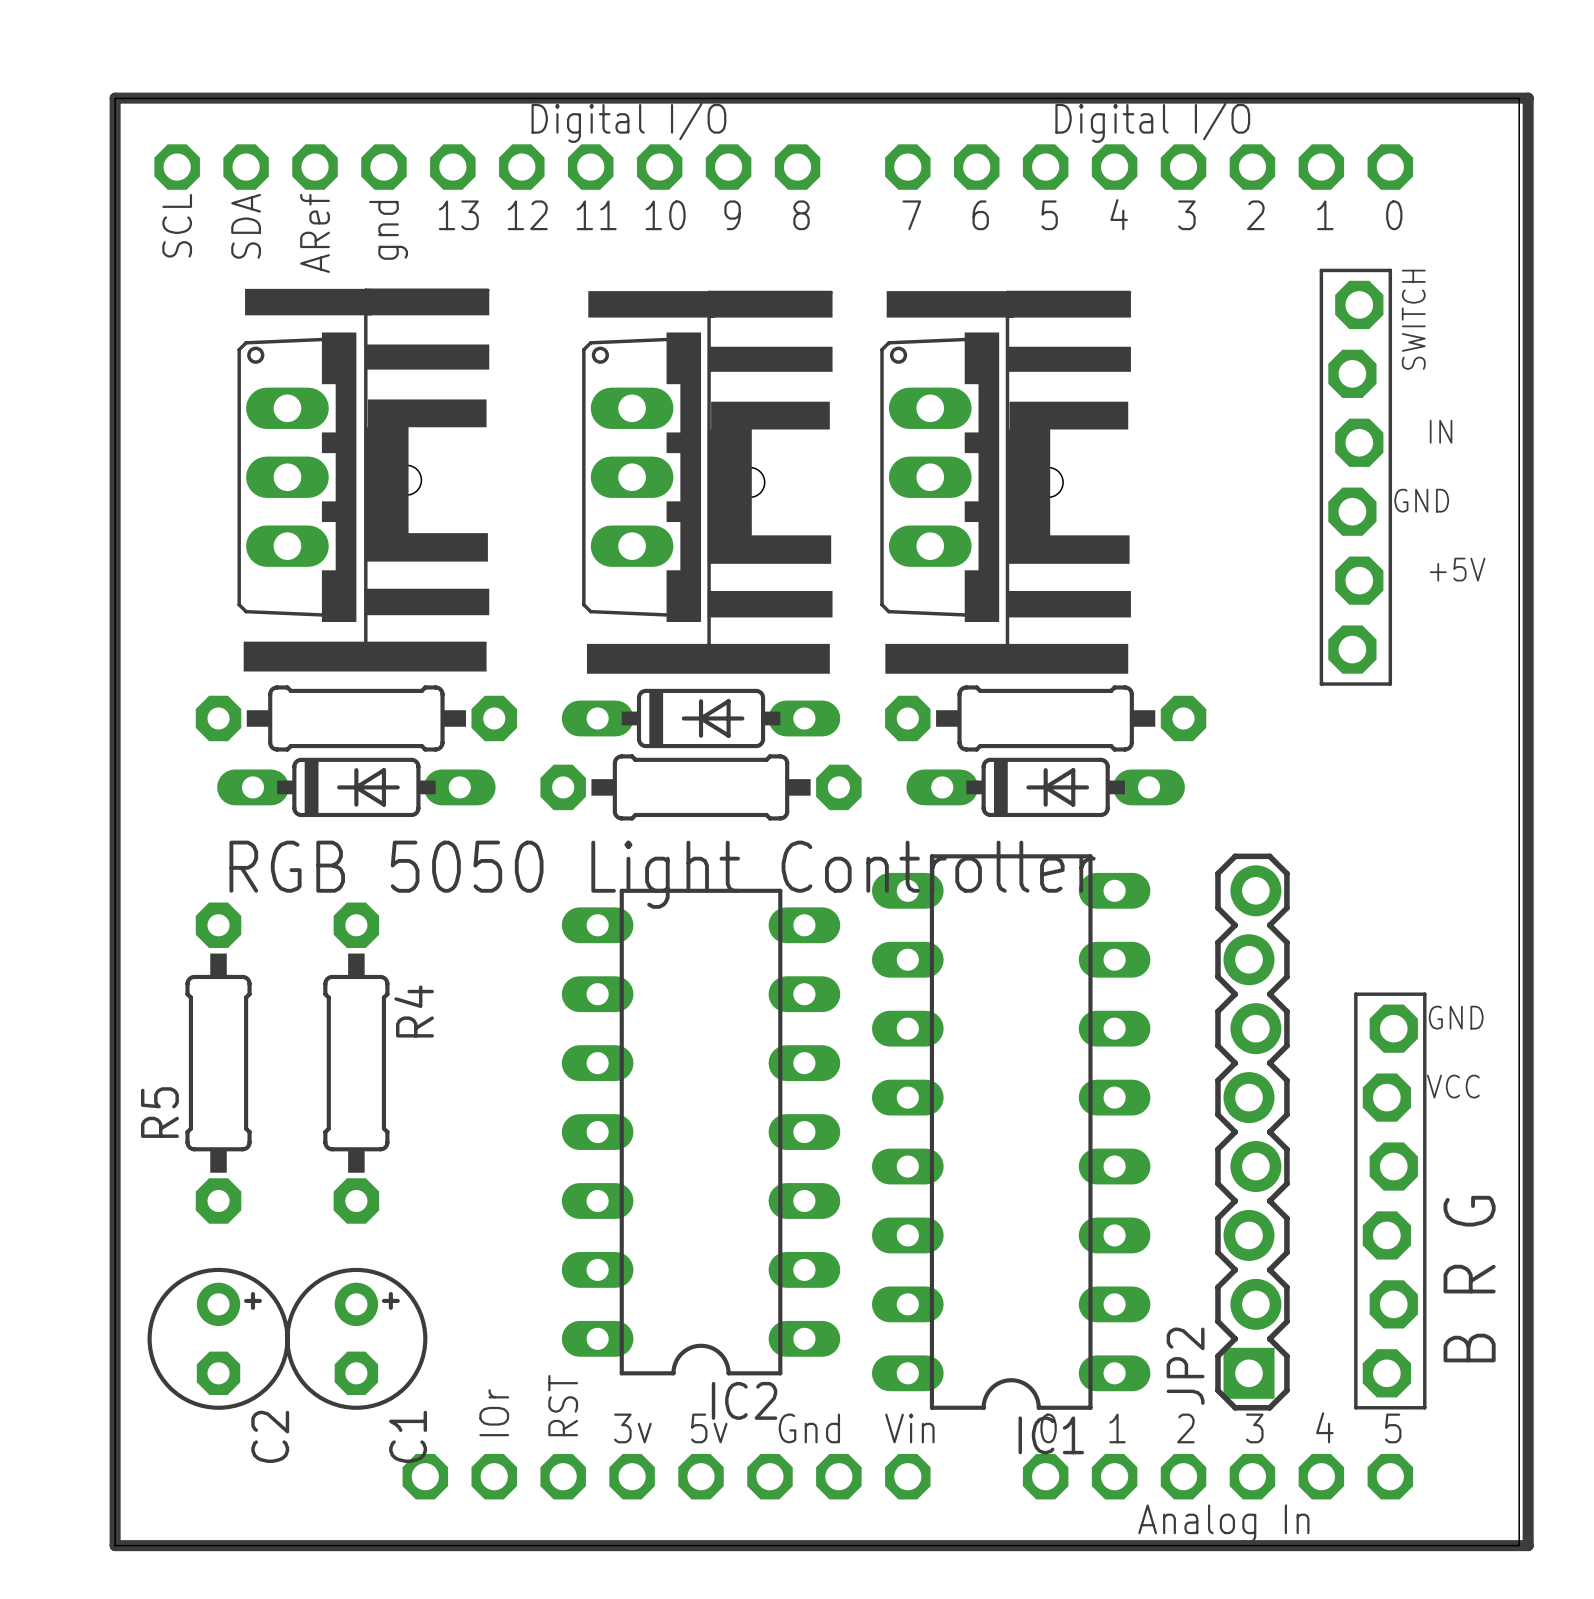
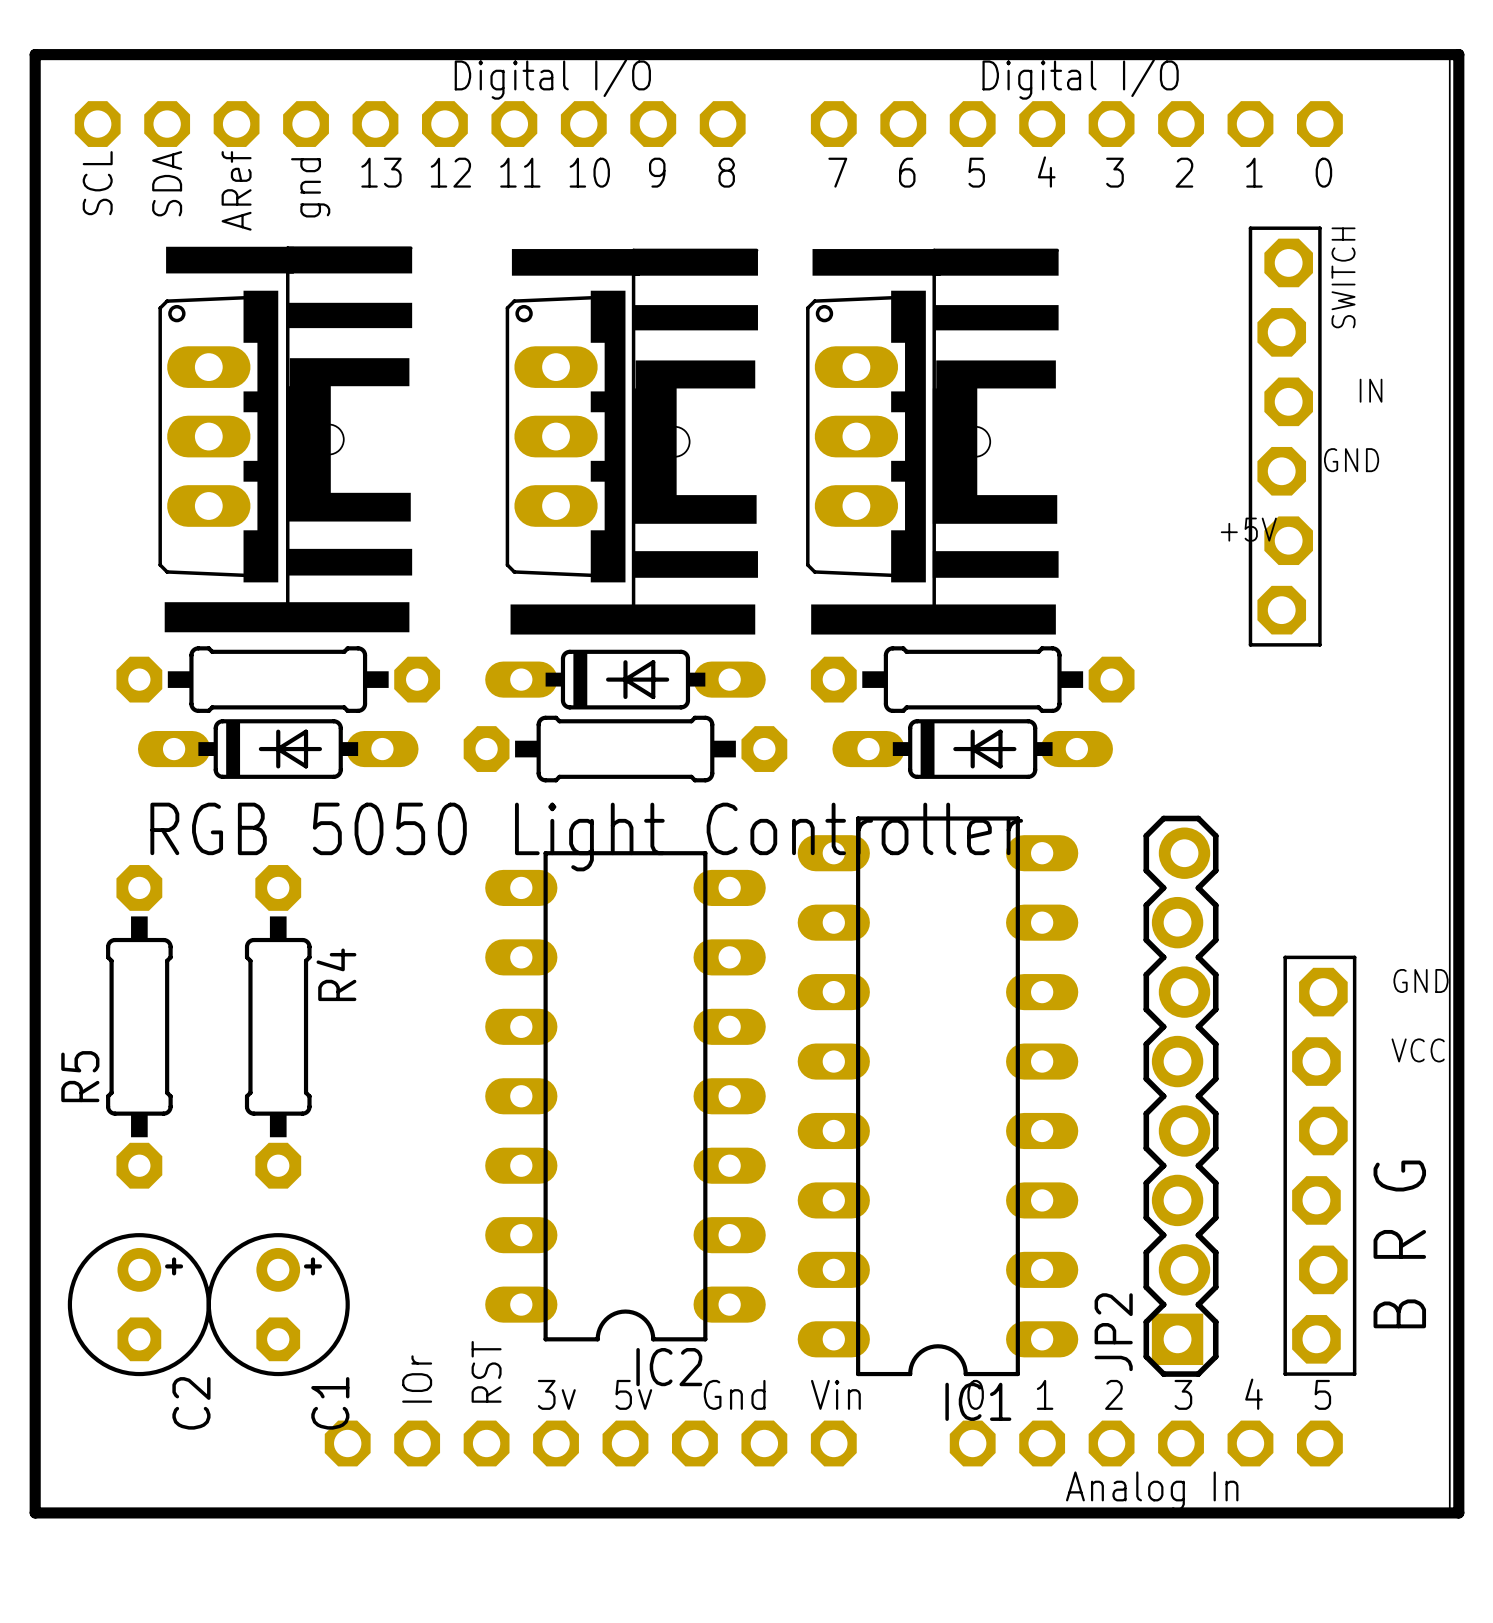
text position: +5V (1457, 569) -> +5V (1248, 529)
text position: GND (1456, 1017) -> GND (1421, 980)
text position: VCC (1453, 1086) -> VCC (1418, 1050)

